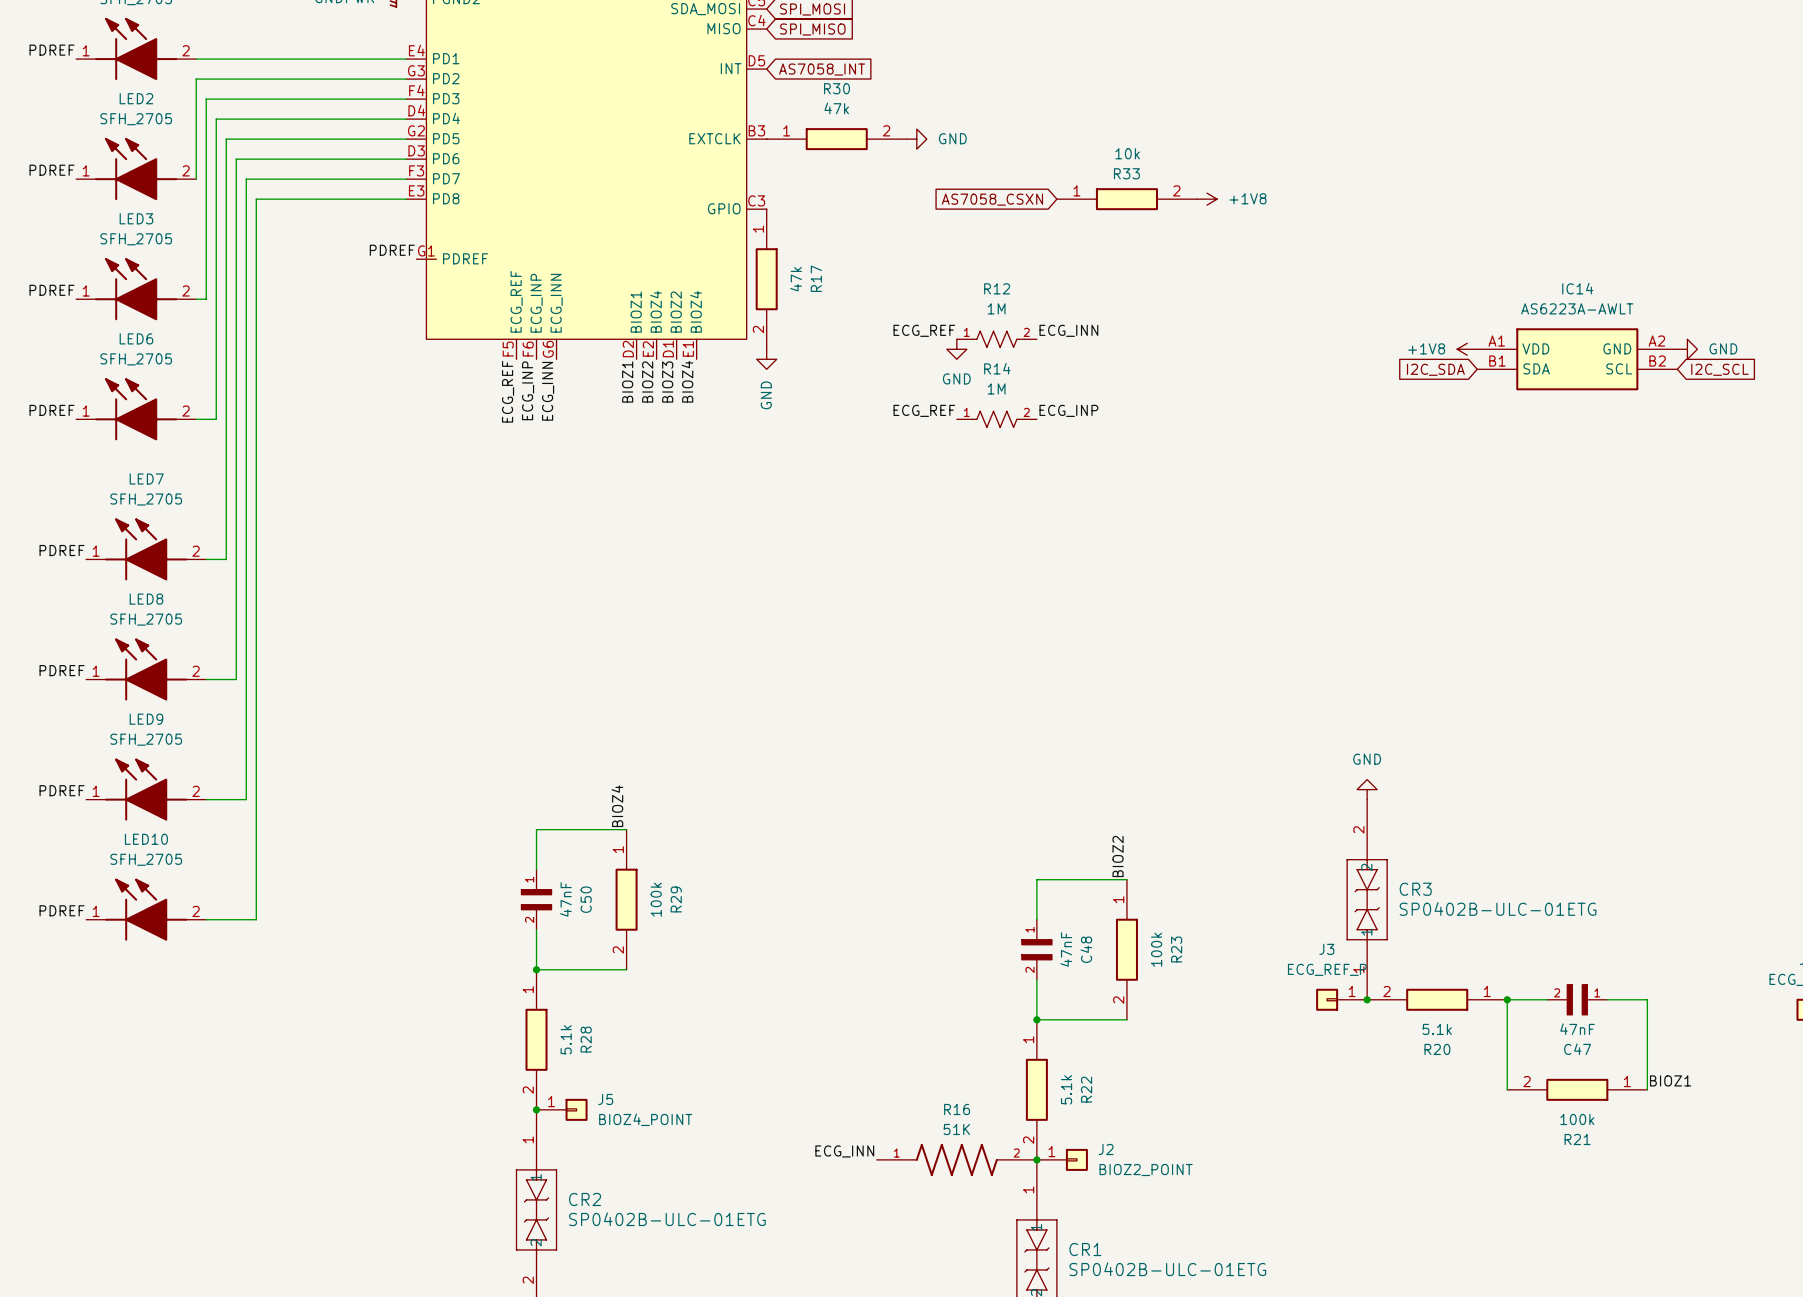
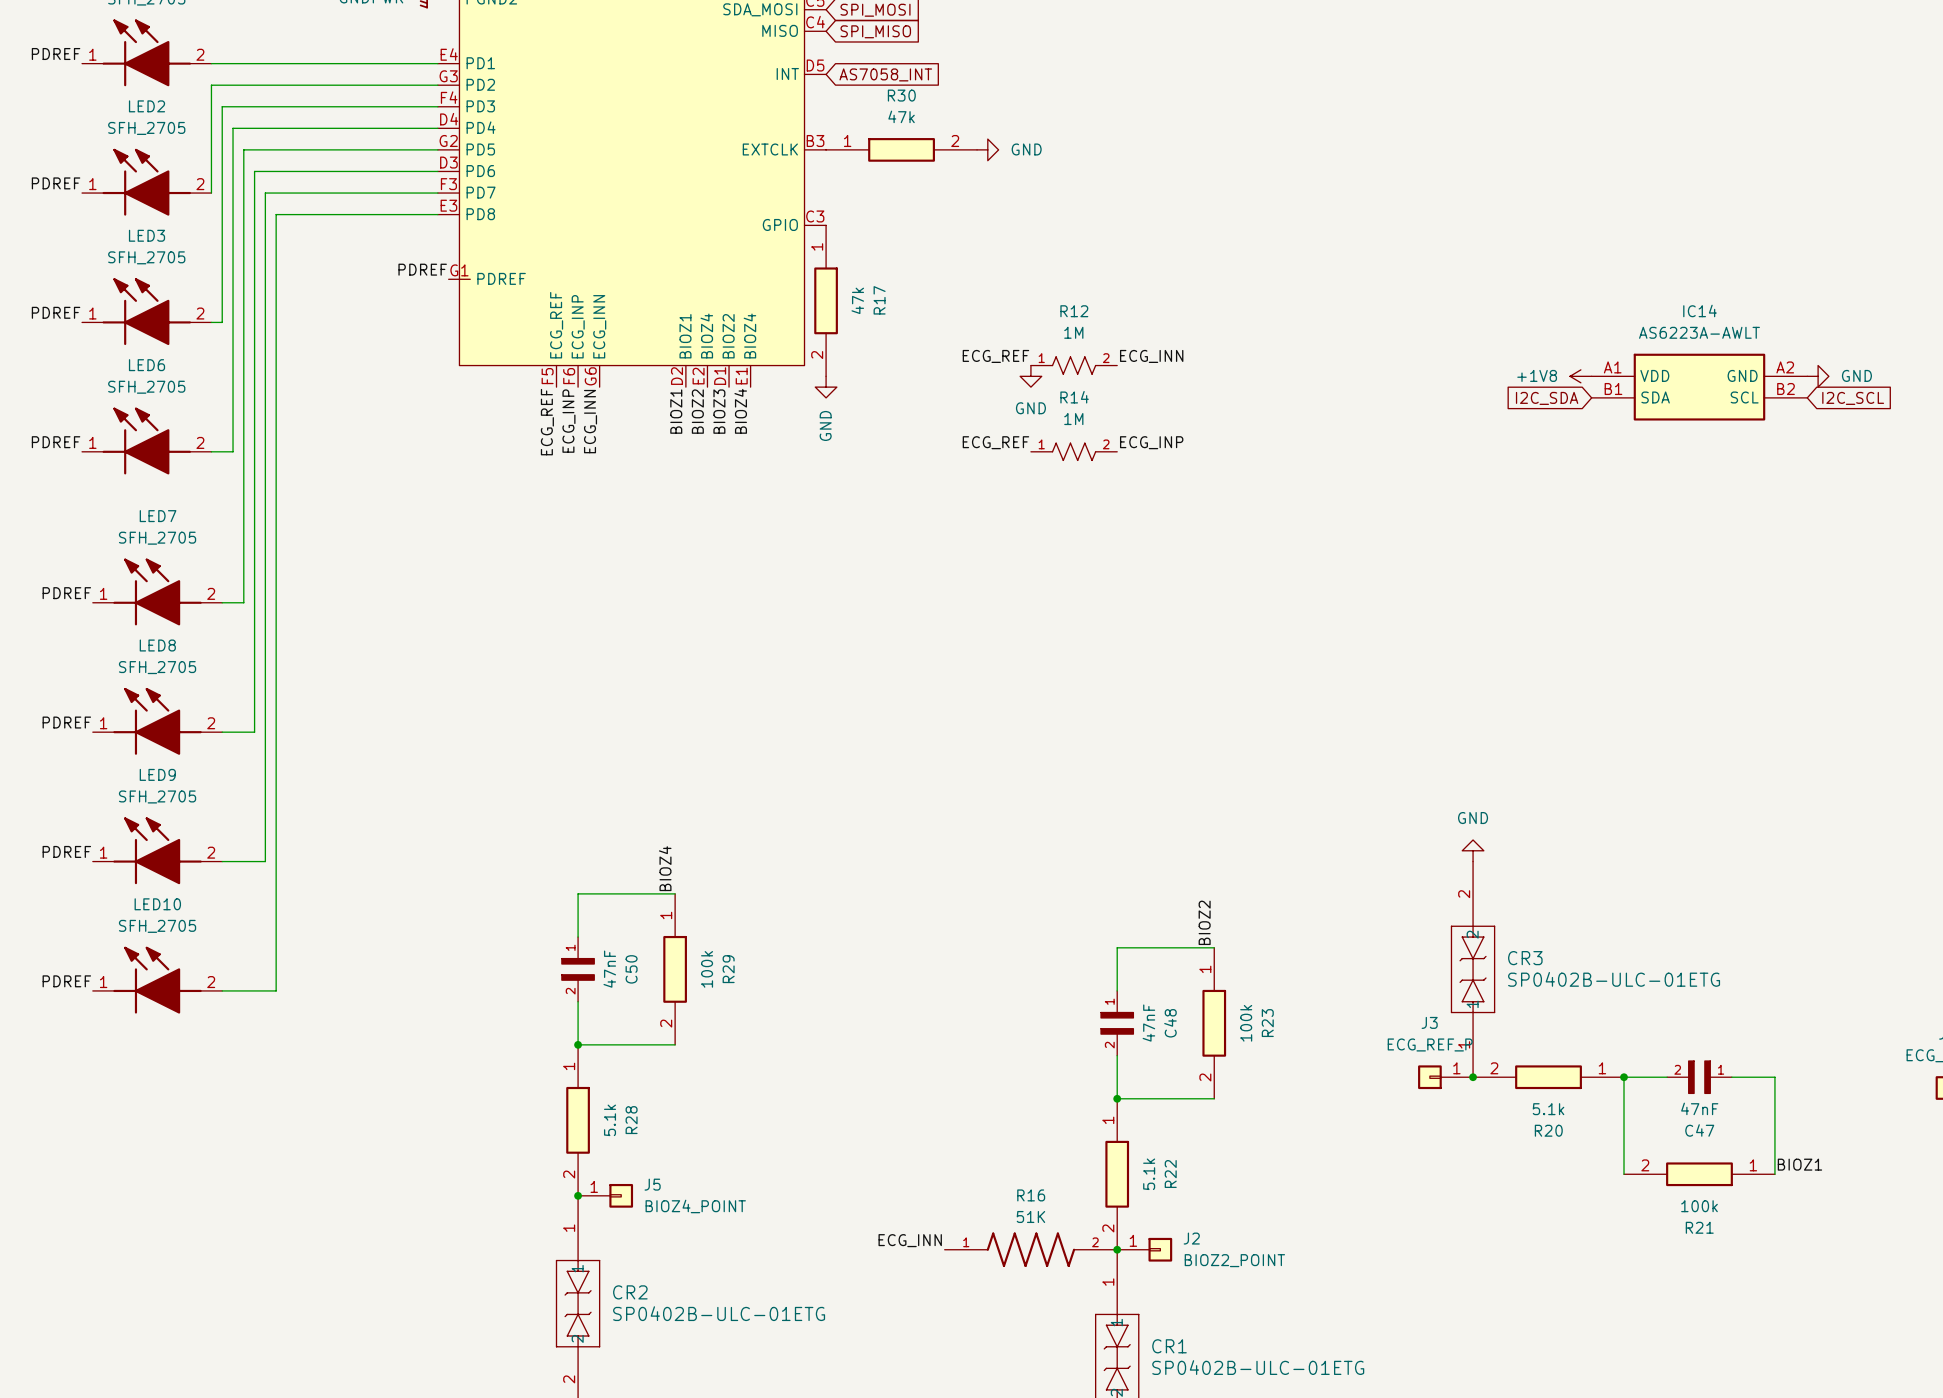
global label: AS7058_CSXN (992, 199) -> none
R33: 10k (1126, 199) -> none
power symbol: +1V8 (1207, 199) -> none

